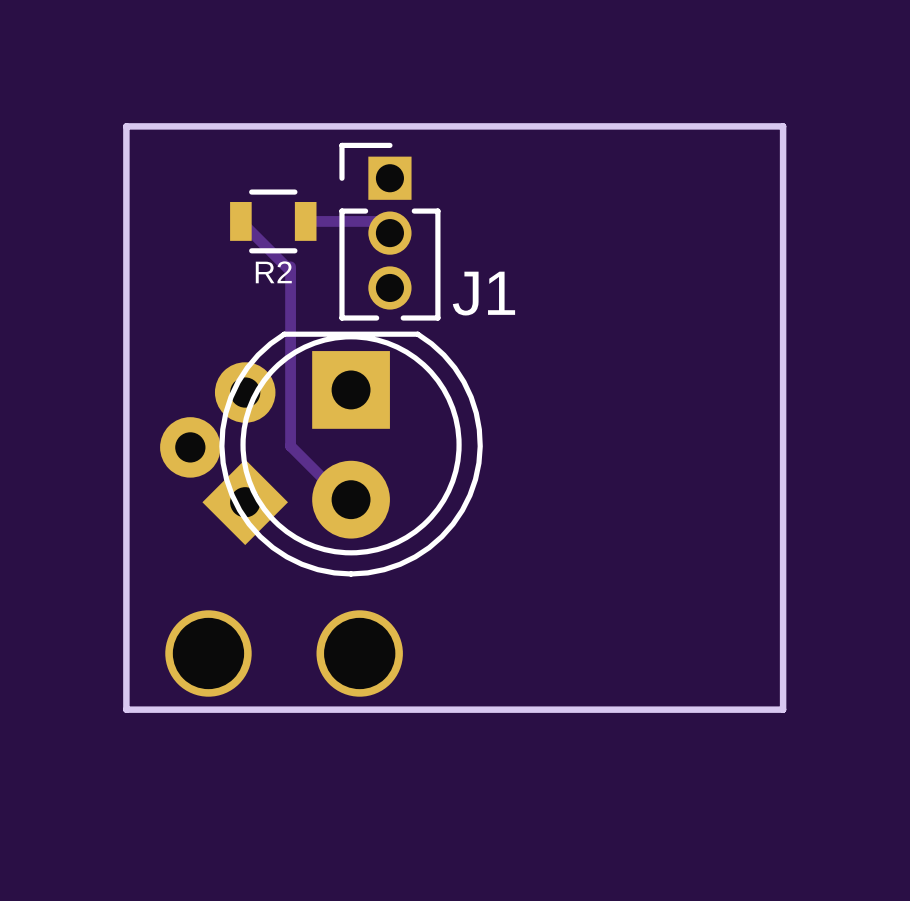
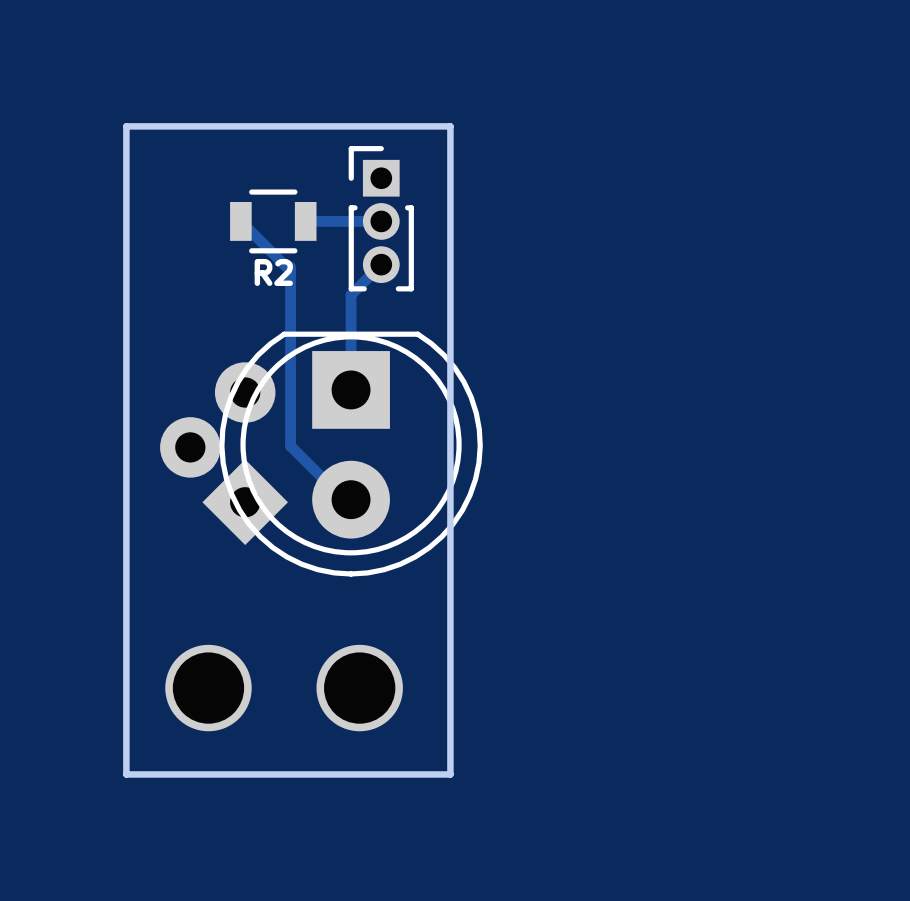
board edge: (450, 126) (783, 126) (783, 709) (126, 709) -> (450, 126) (450, 774) (126, 774) (126, 709)
part: none -> (381, 218)
J1: (389, 231) -> none
track: none -> (381, 264) (351, 294) (351, 394)
part position: (208, 653) -> (208, 688)
part position: (359, 653) -> (359, 688)

